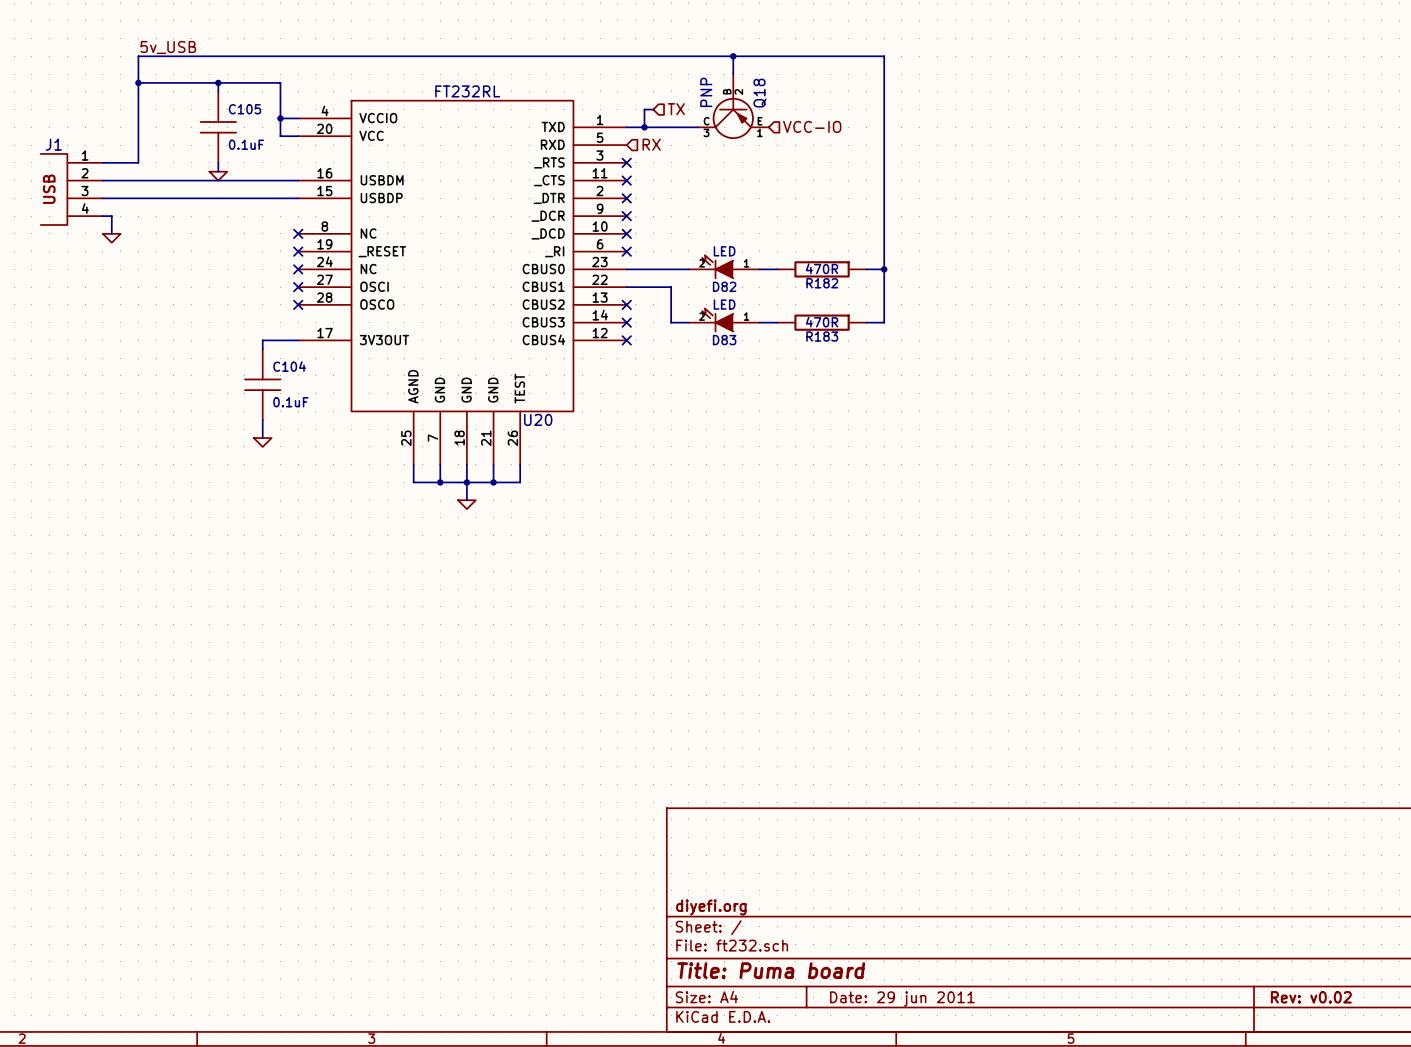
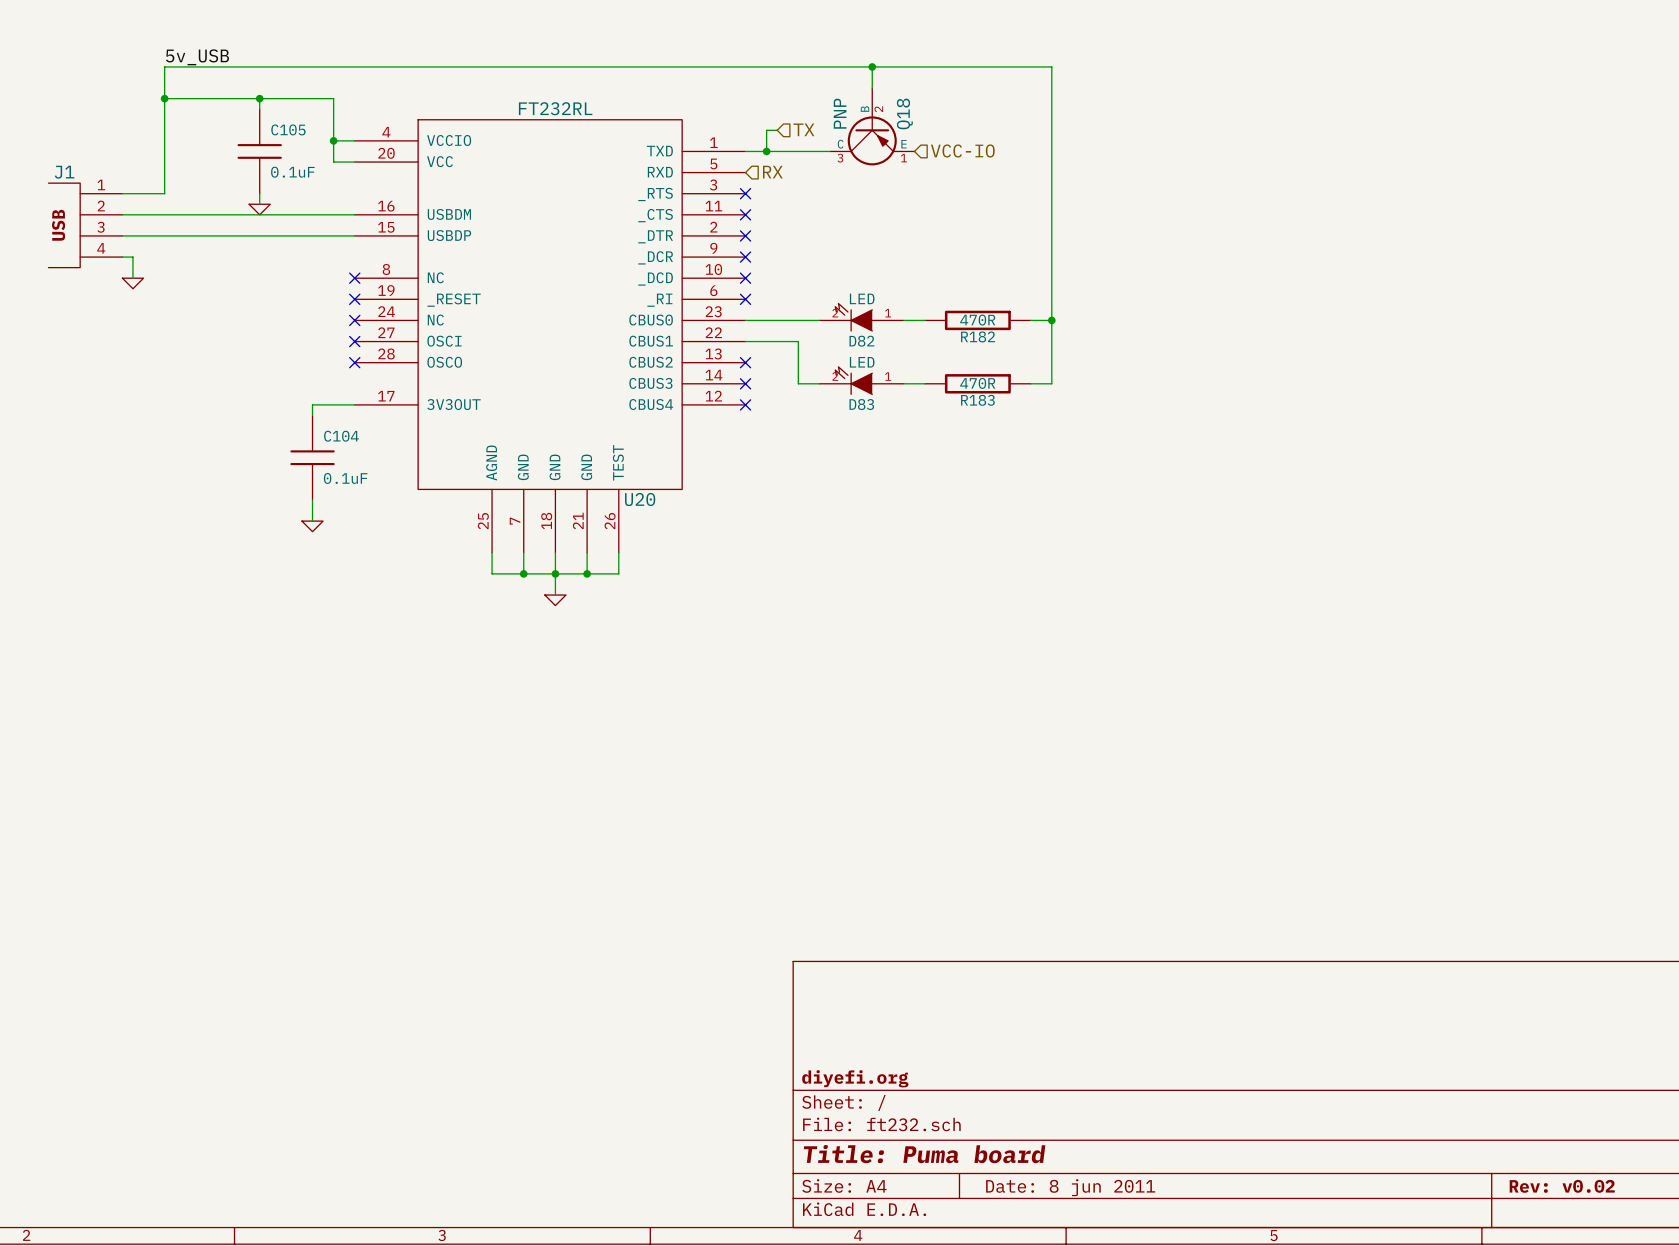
title block: Date: 29 jun 2011 (902, 999) -> Date: 8 jun 2011 (1070, 1187)

